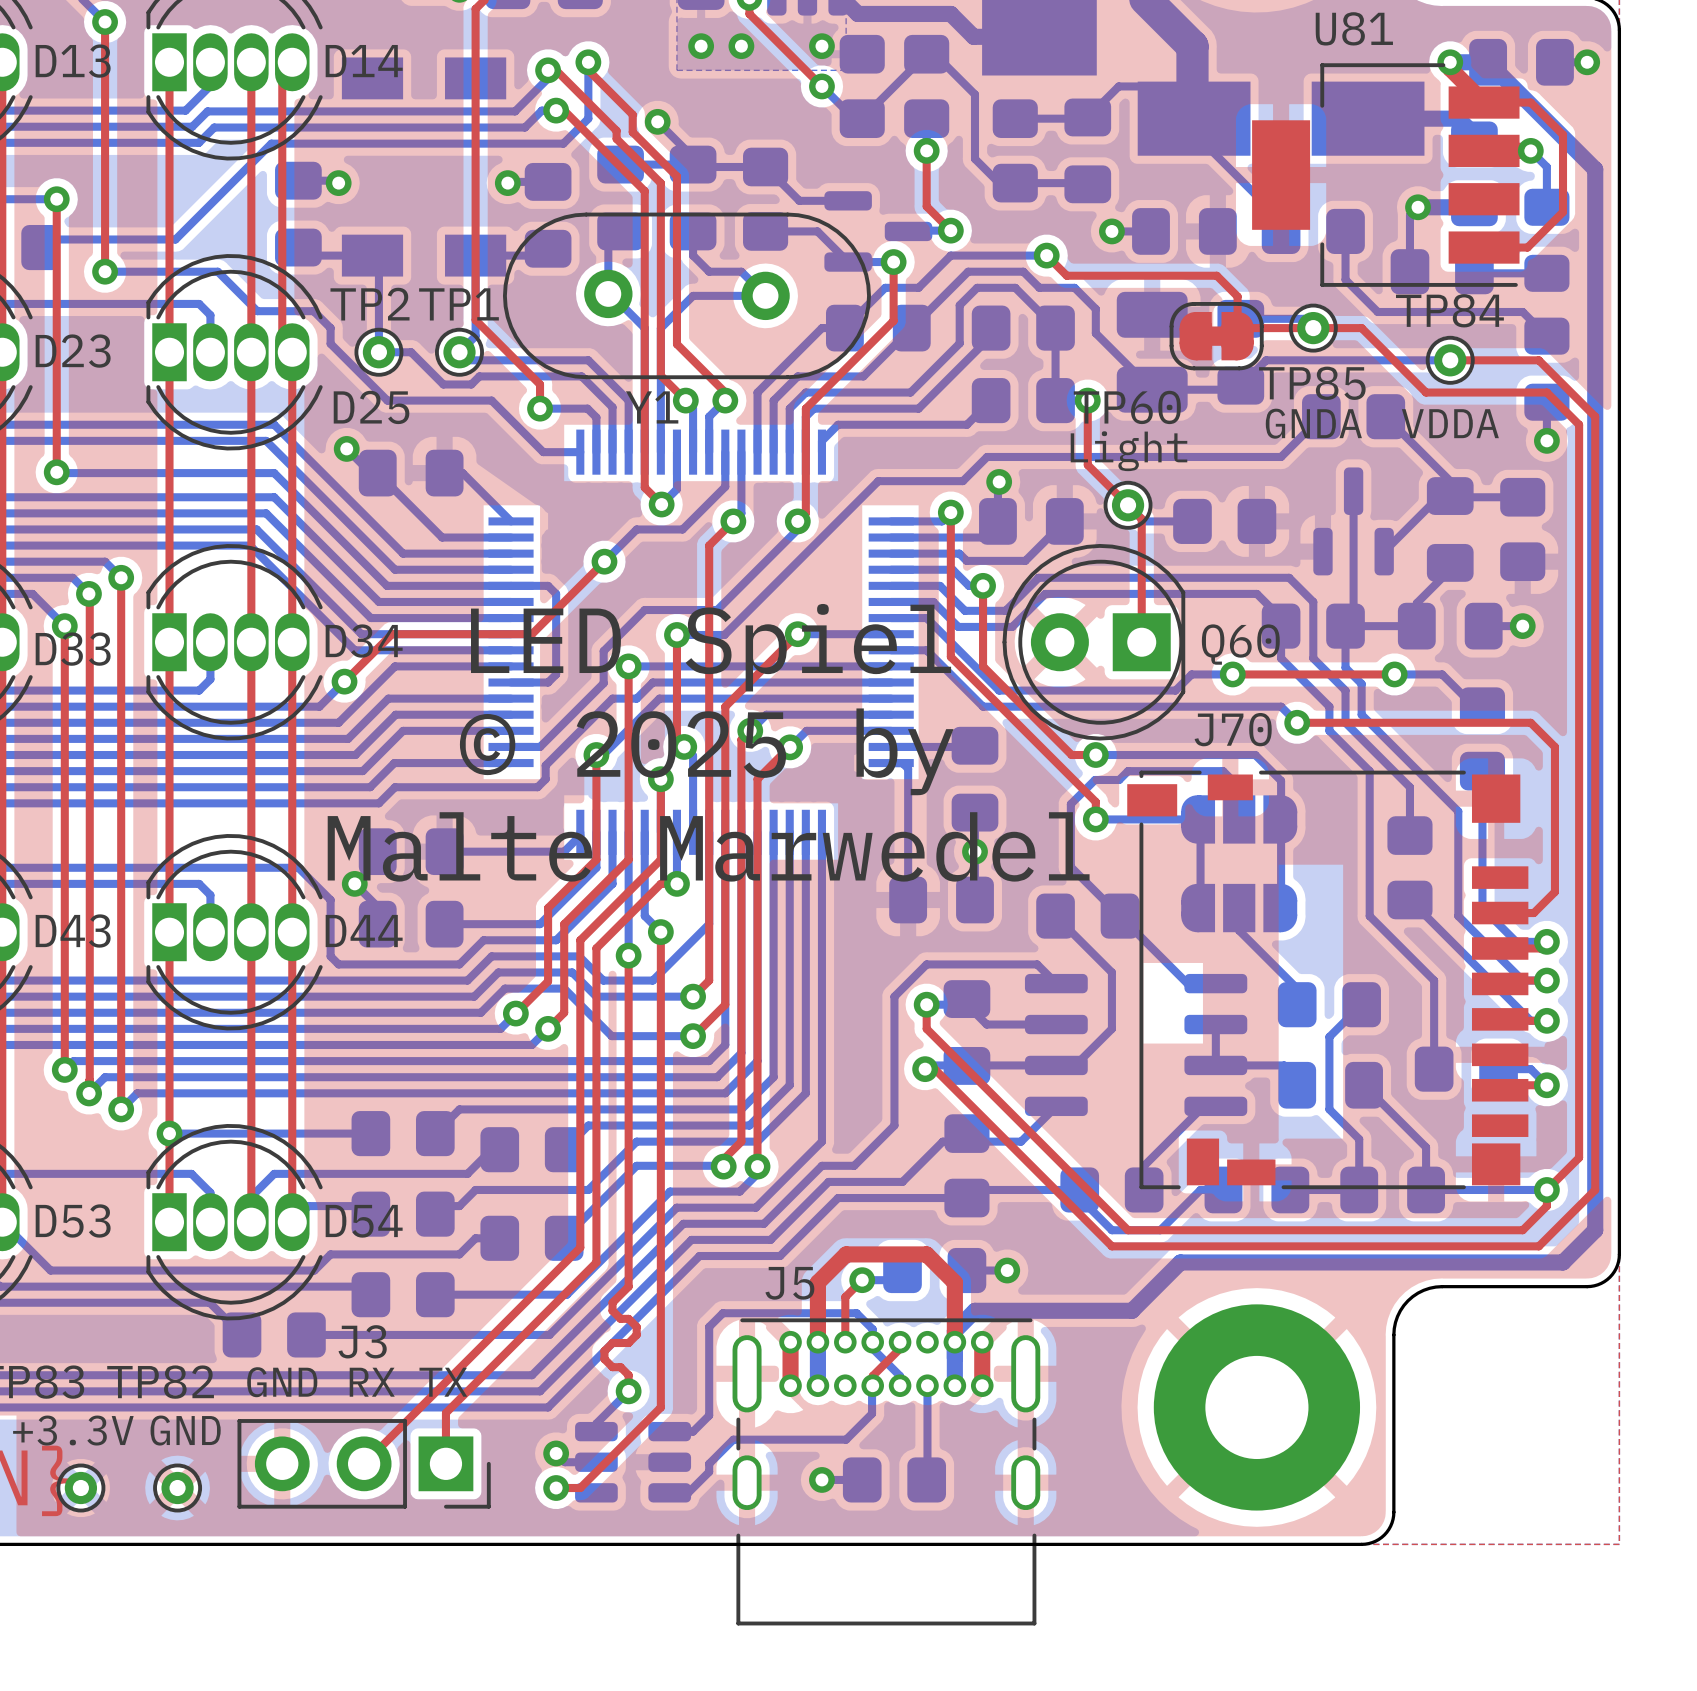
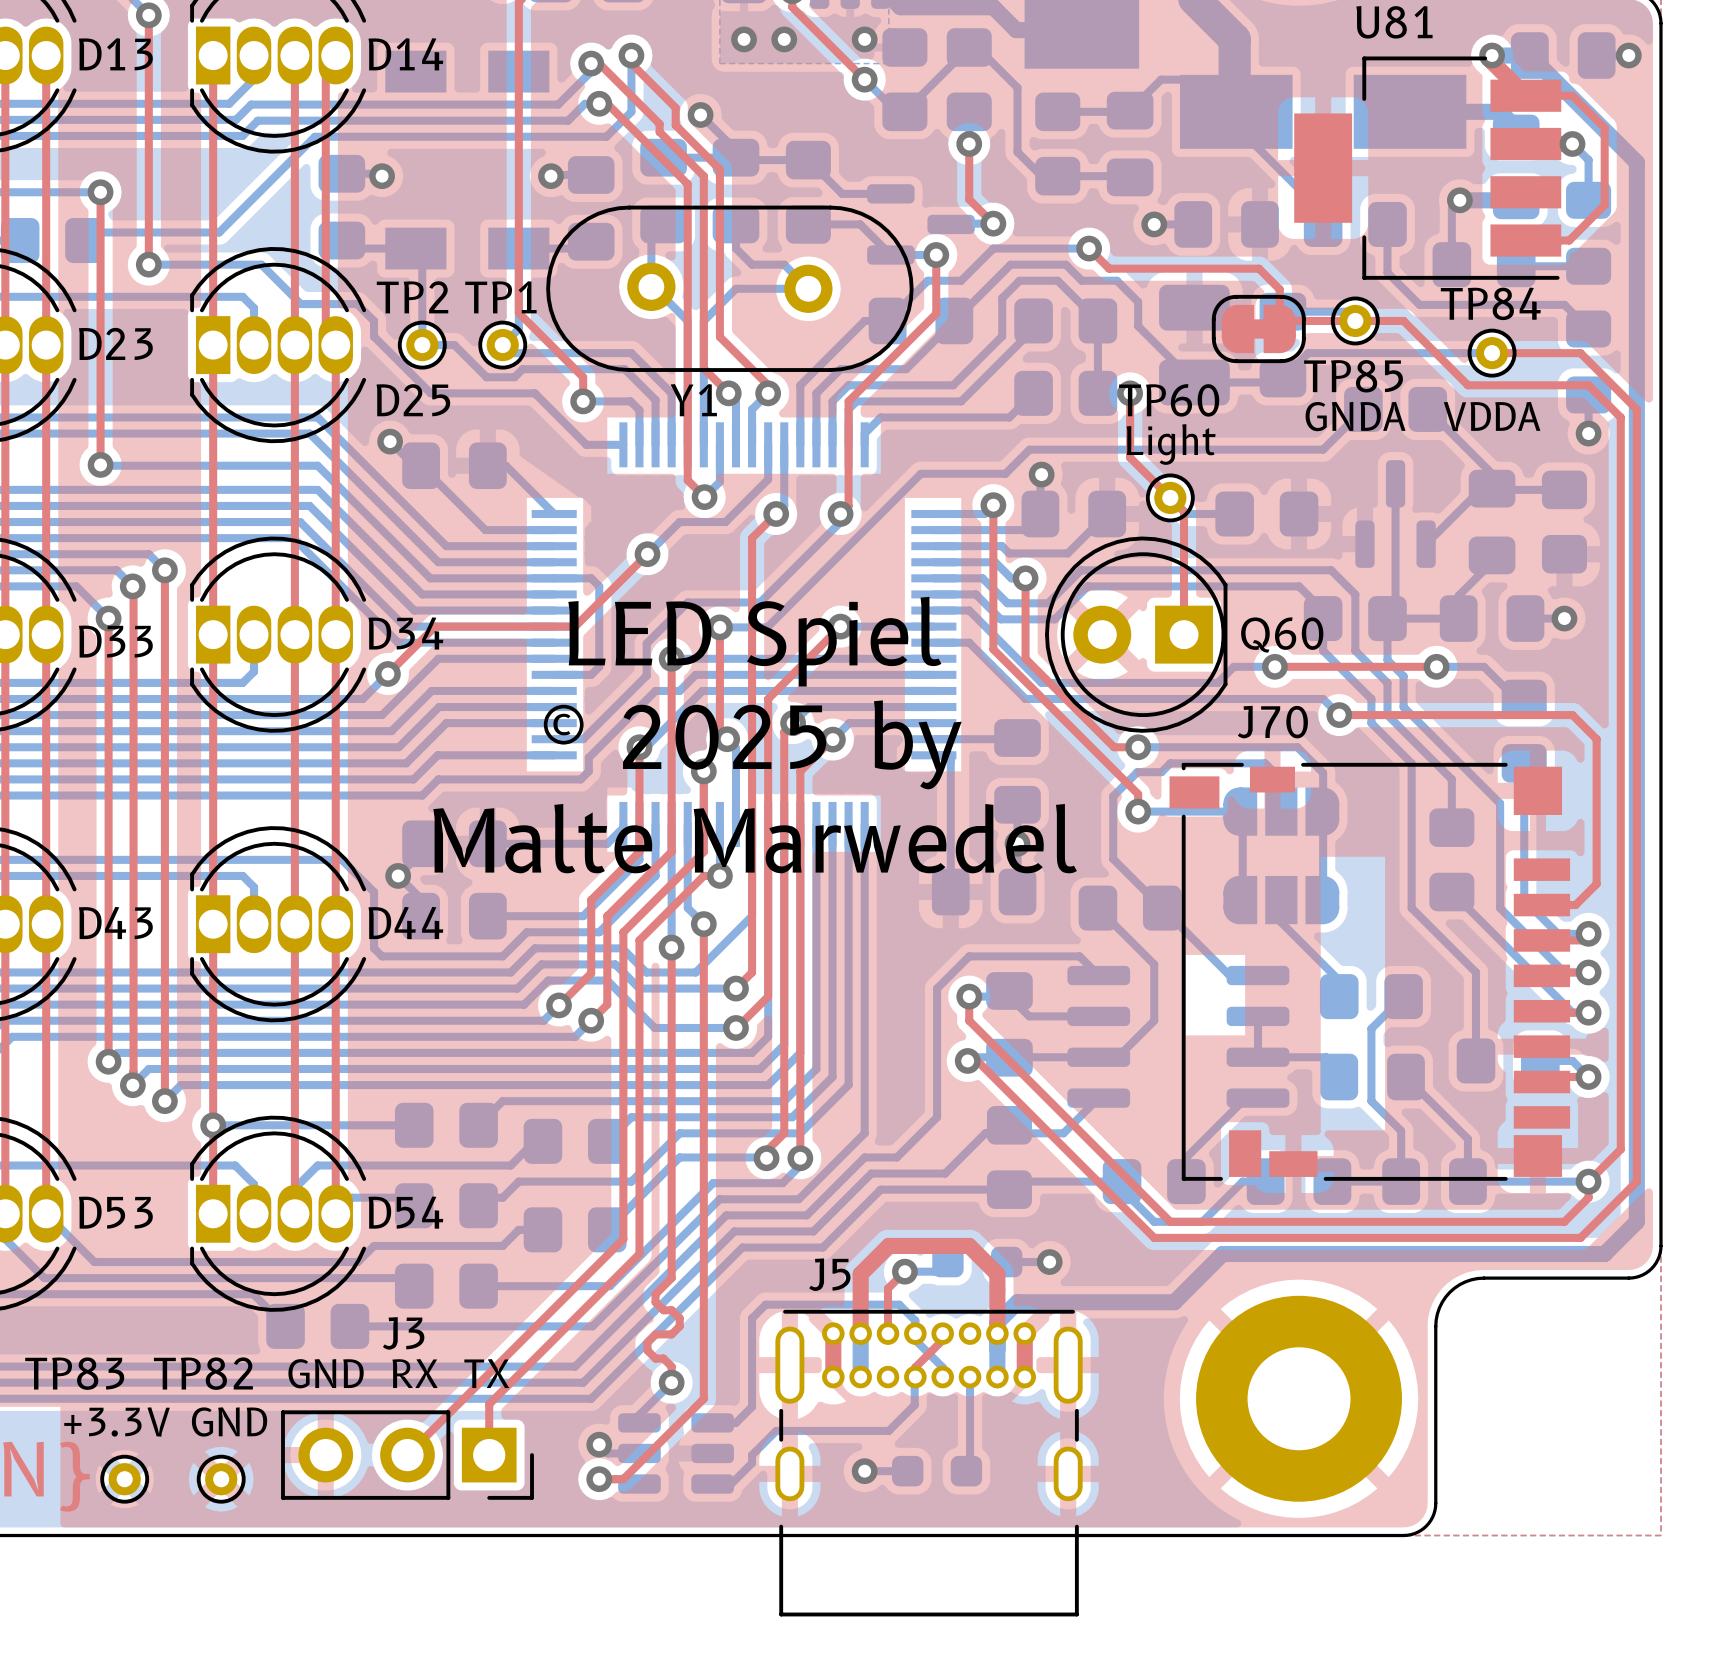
part footprint: [883, 1247, 987, 1294] -> [932, 1246, 1023, 1278]
part footprint: [842, 1457, 947, 1503] -> [892, 1455, 983, 1487]

